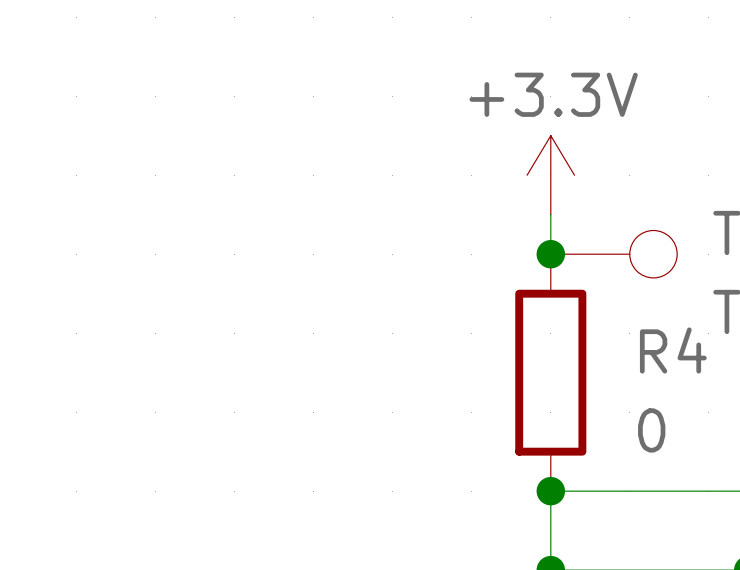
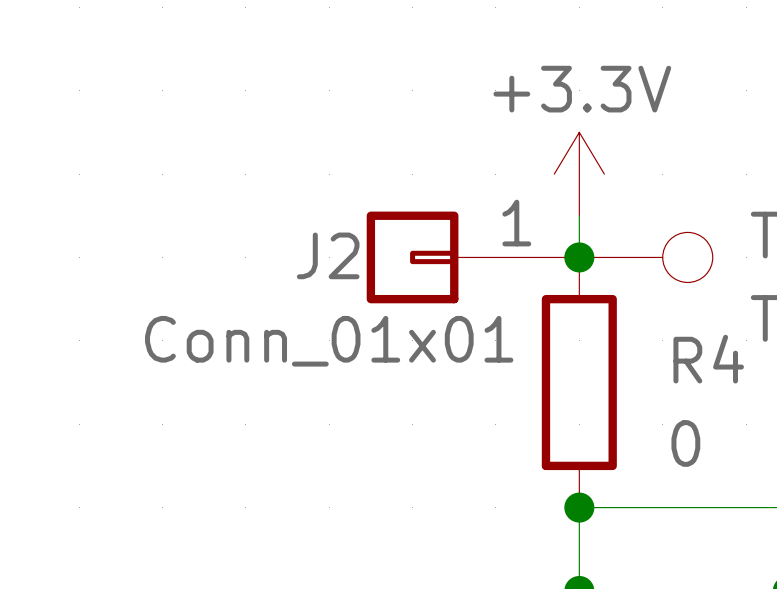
J2: none -> Conn_01x01 (473, 257)

